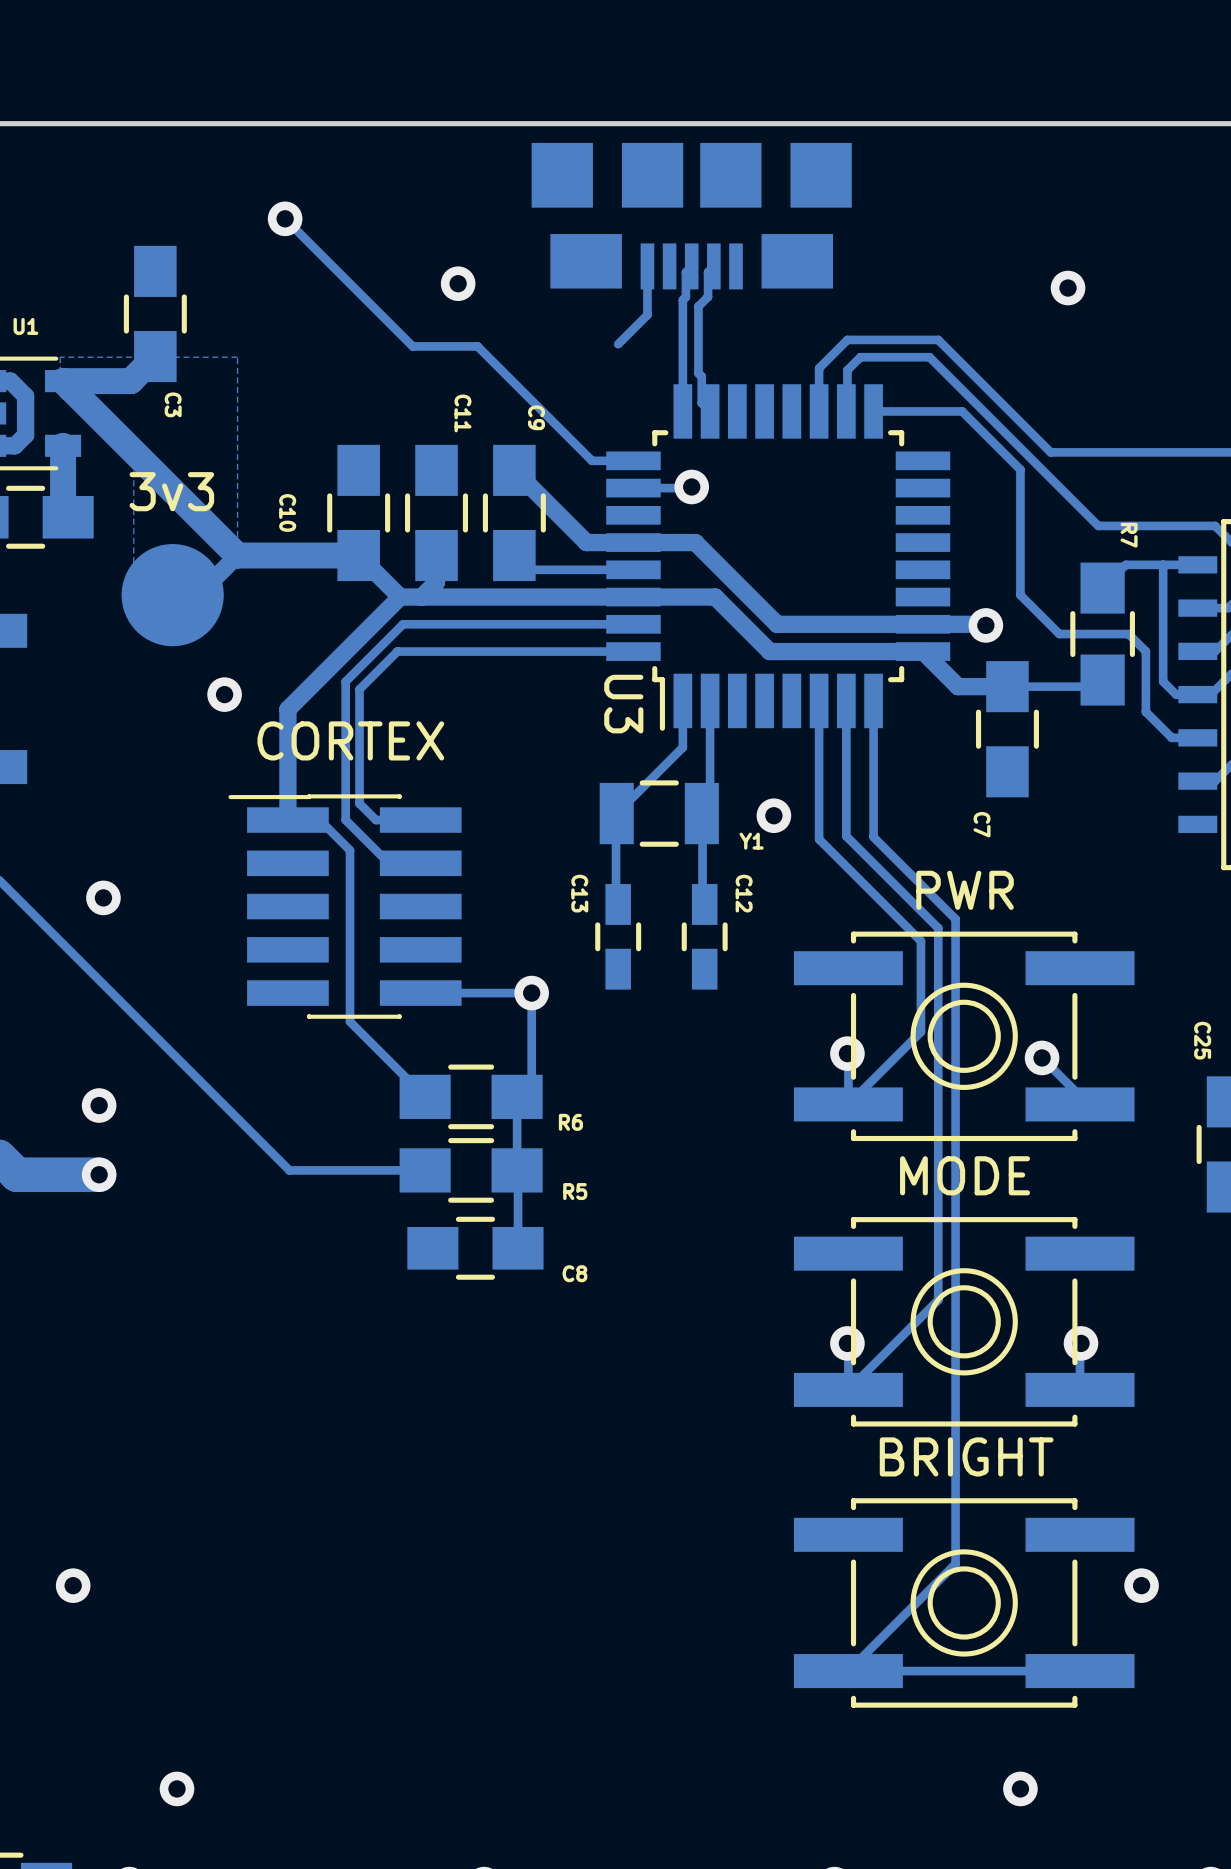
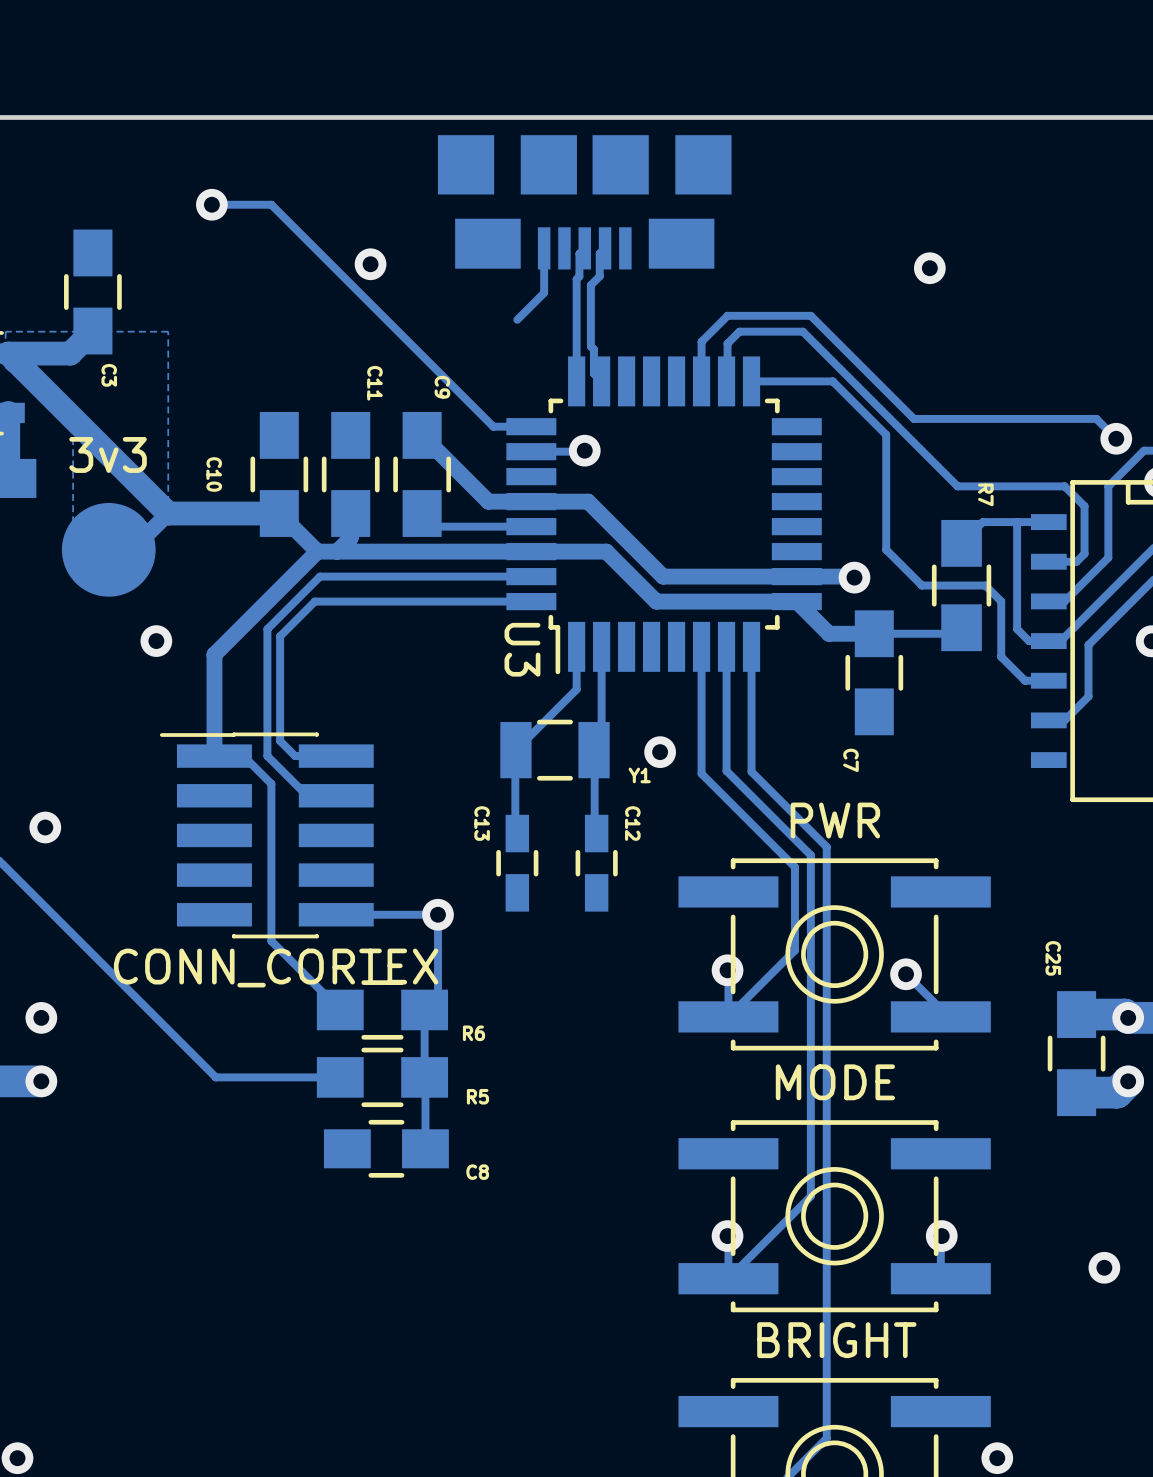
track: (285, 218) (412, 346) (477, 346) -> (211, 204) (271, 204) (388, 321)
part value: CORTEX (350, 740) -> CONN_CORTEX (276, 968)

